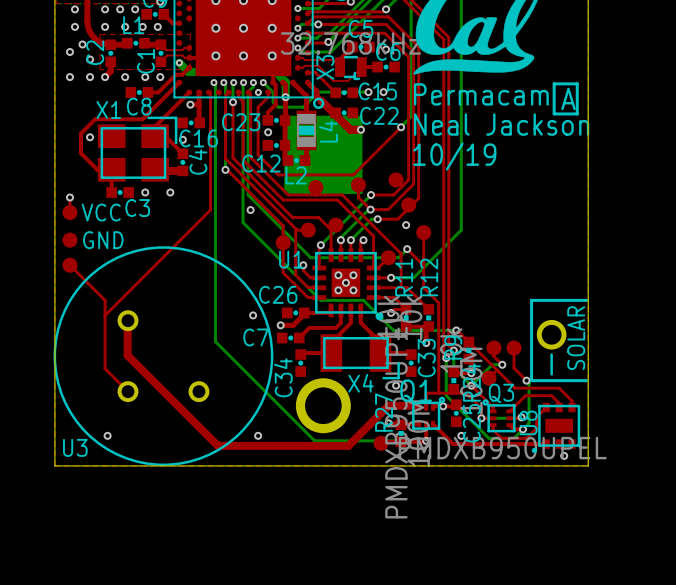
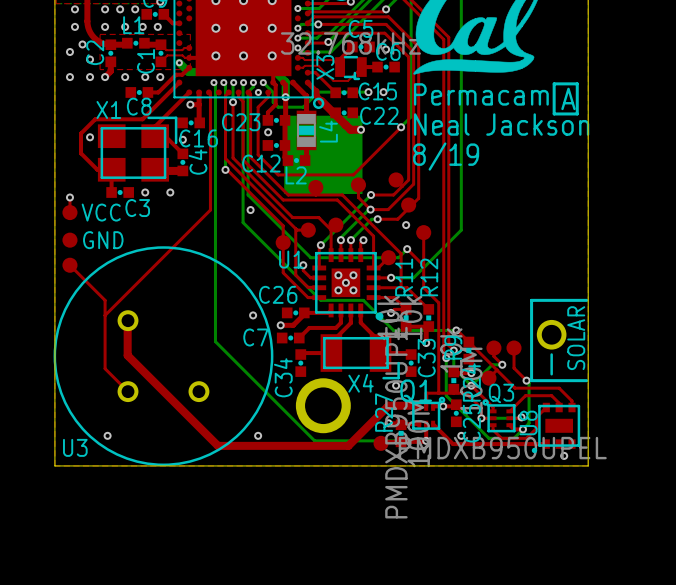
text: 10/19 (454, 156) -> 8/19 (446, 156)

